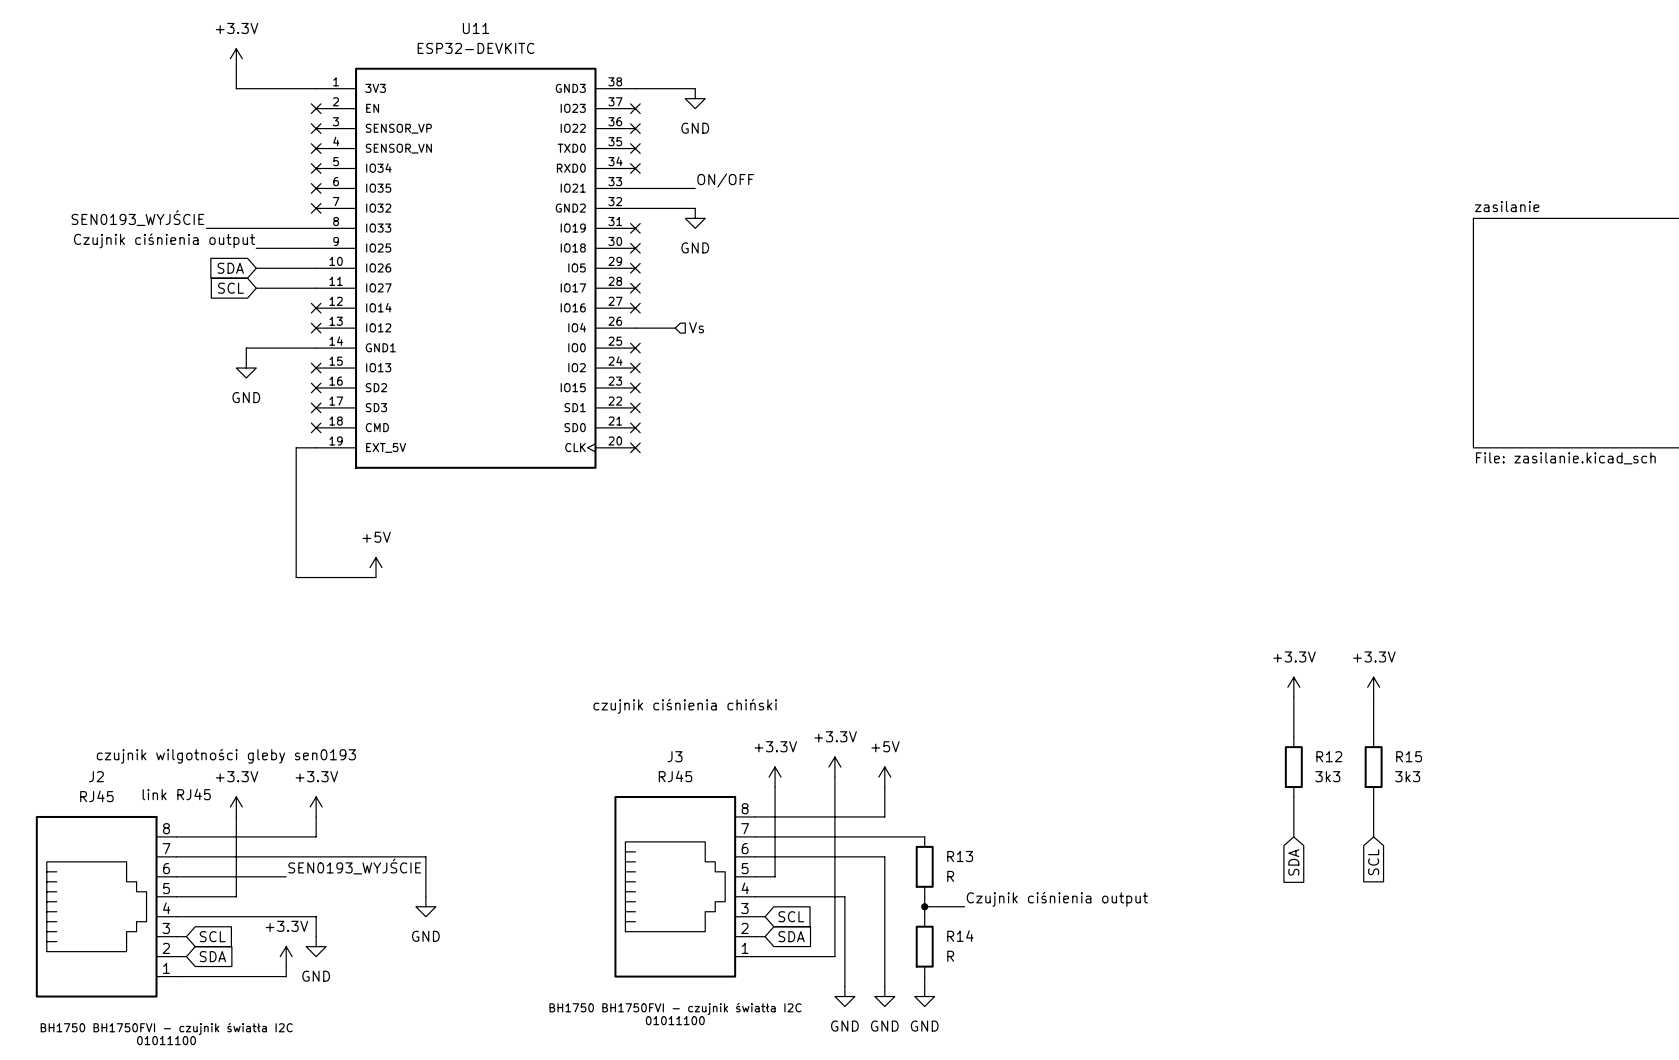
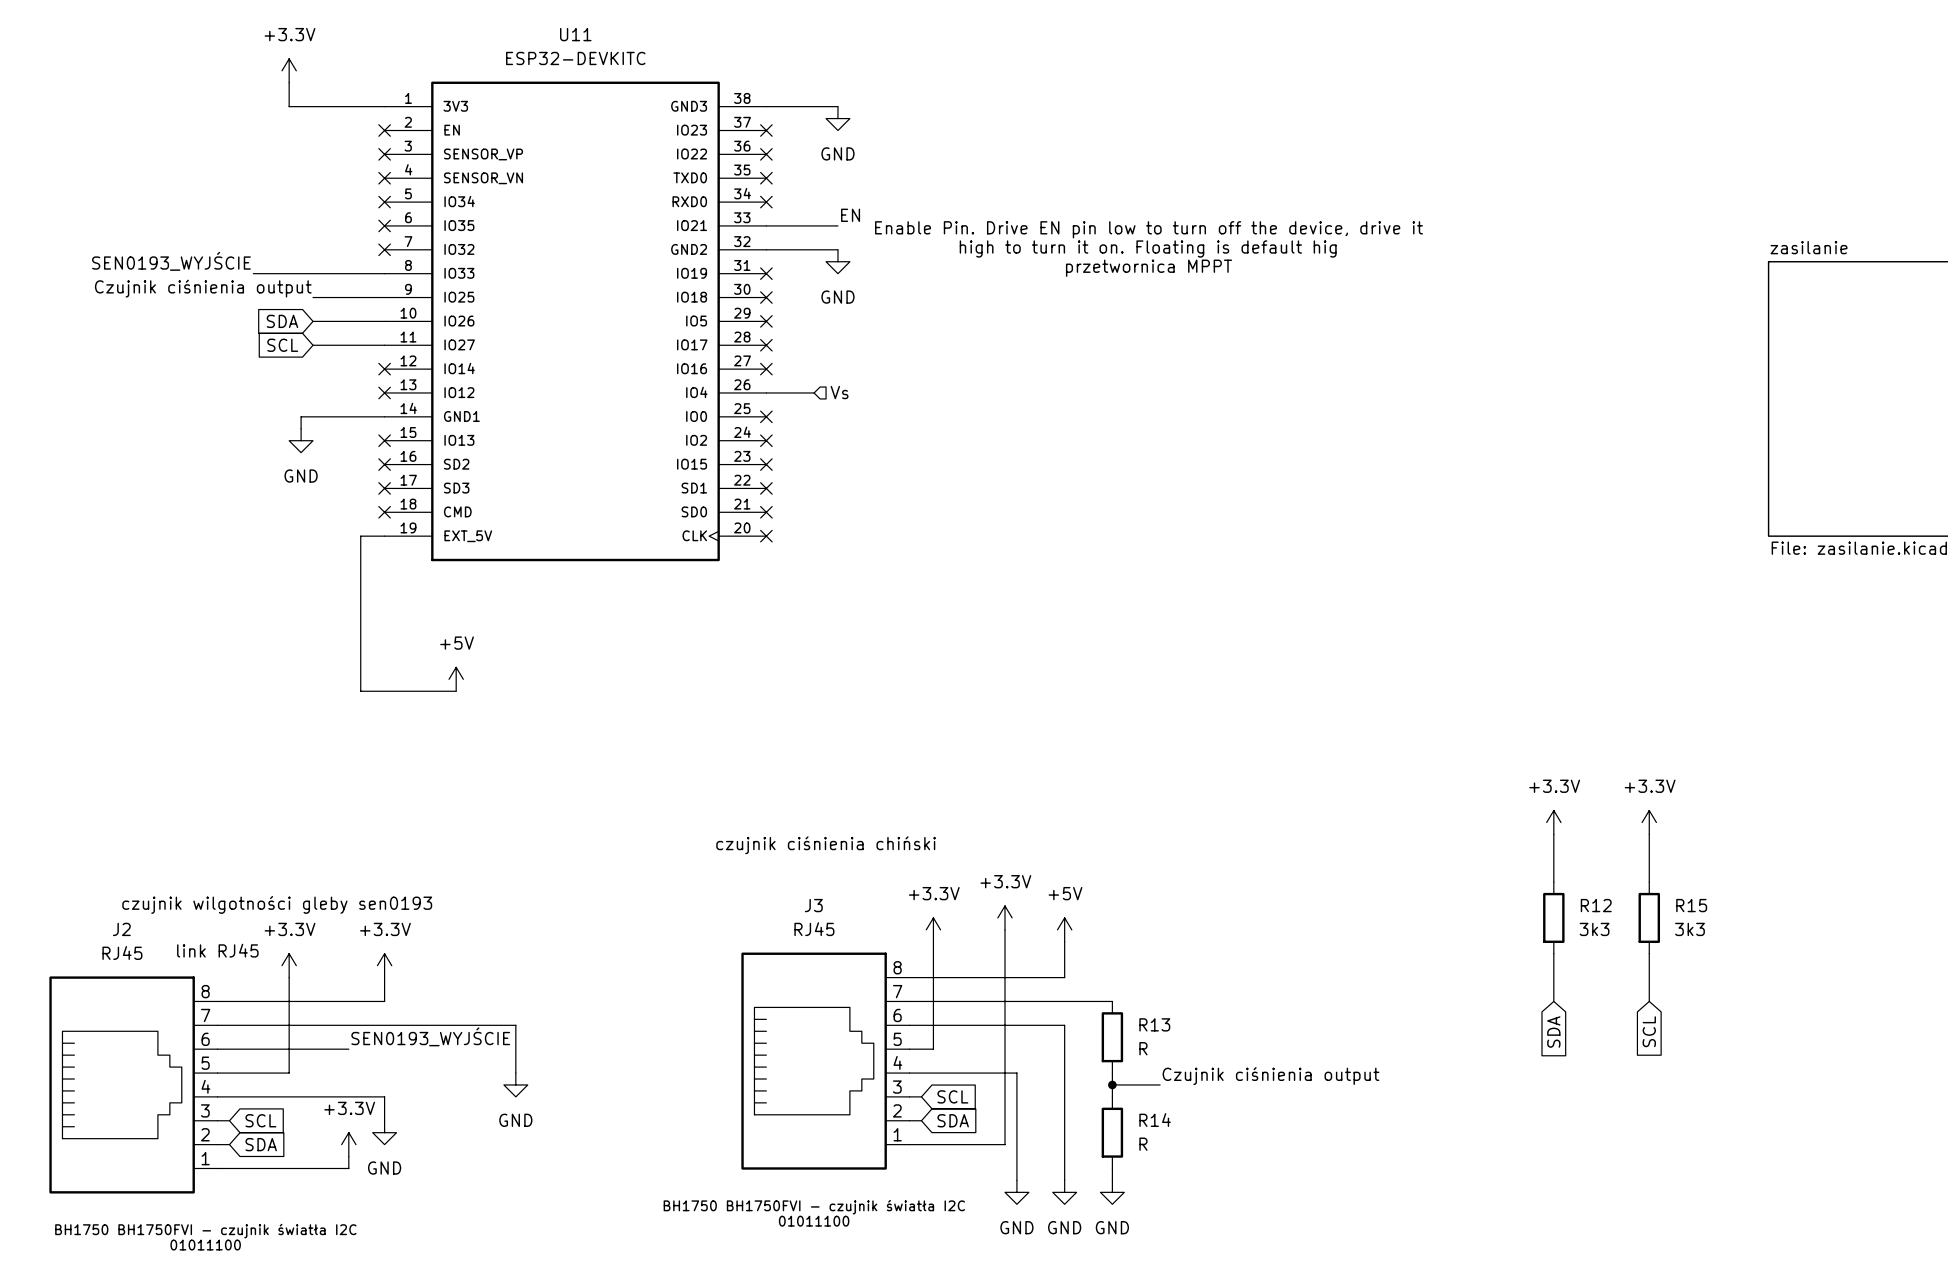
label: ON/OFF (725, 180) -> EN (850, 215)
text: none -> Enable Pin. Drive EN pin low to turn off the device, drive it (1149, 229)
text: none -> high to turn it on. Floating is default hig (1148, 249)
text: none -> przetwornica MPPT (1149, 268)

